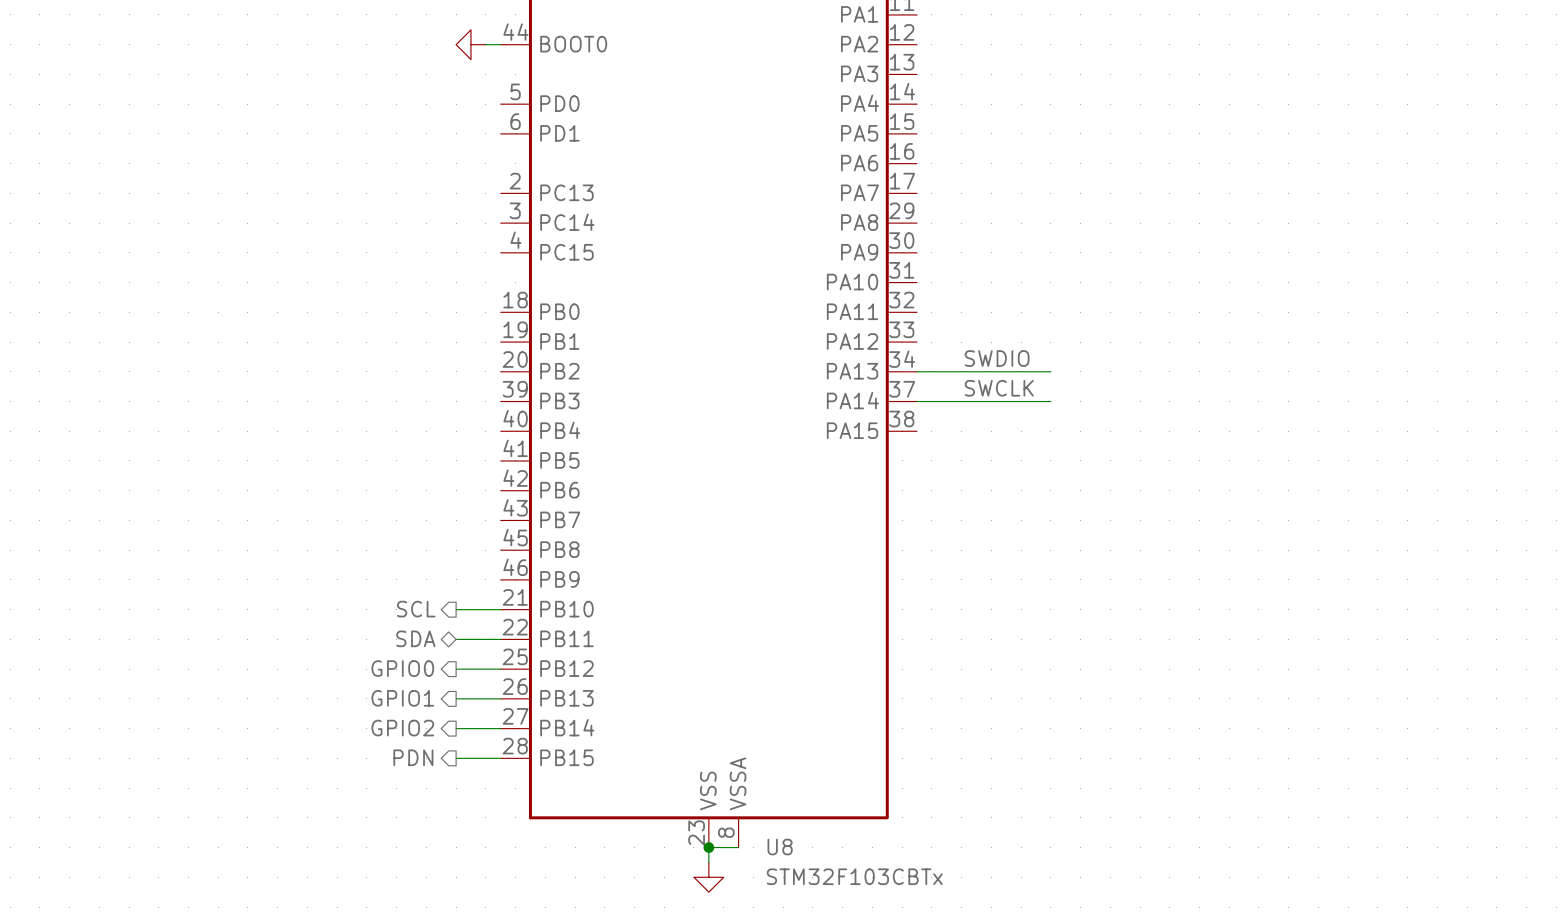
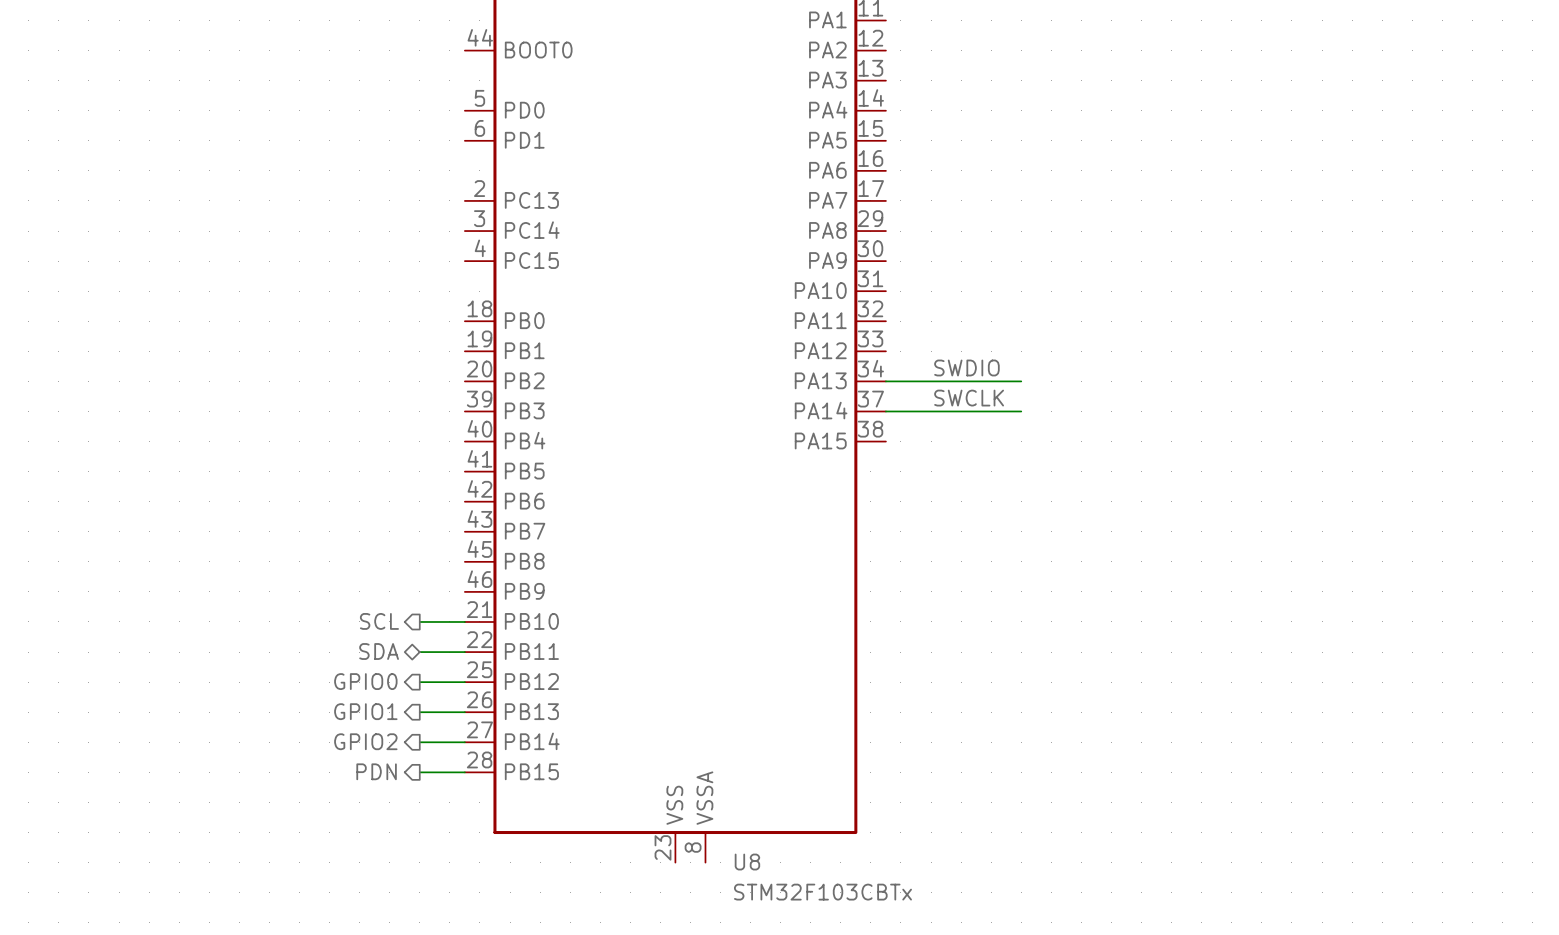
power symbol: (470, 44) -> none
wire: (485, 44) (500, 44) -> none
junction: (708, 847) -> none
wire: (738, 847) (708, 847) (708, 862) -> none
power symbol: (708, 877) -> none

